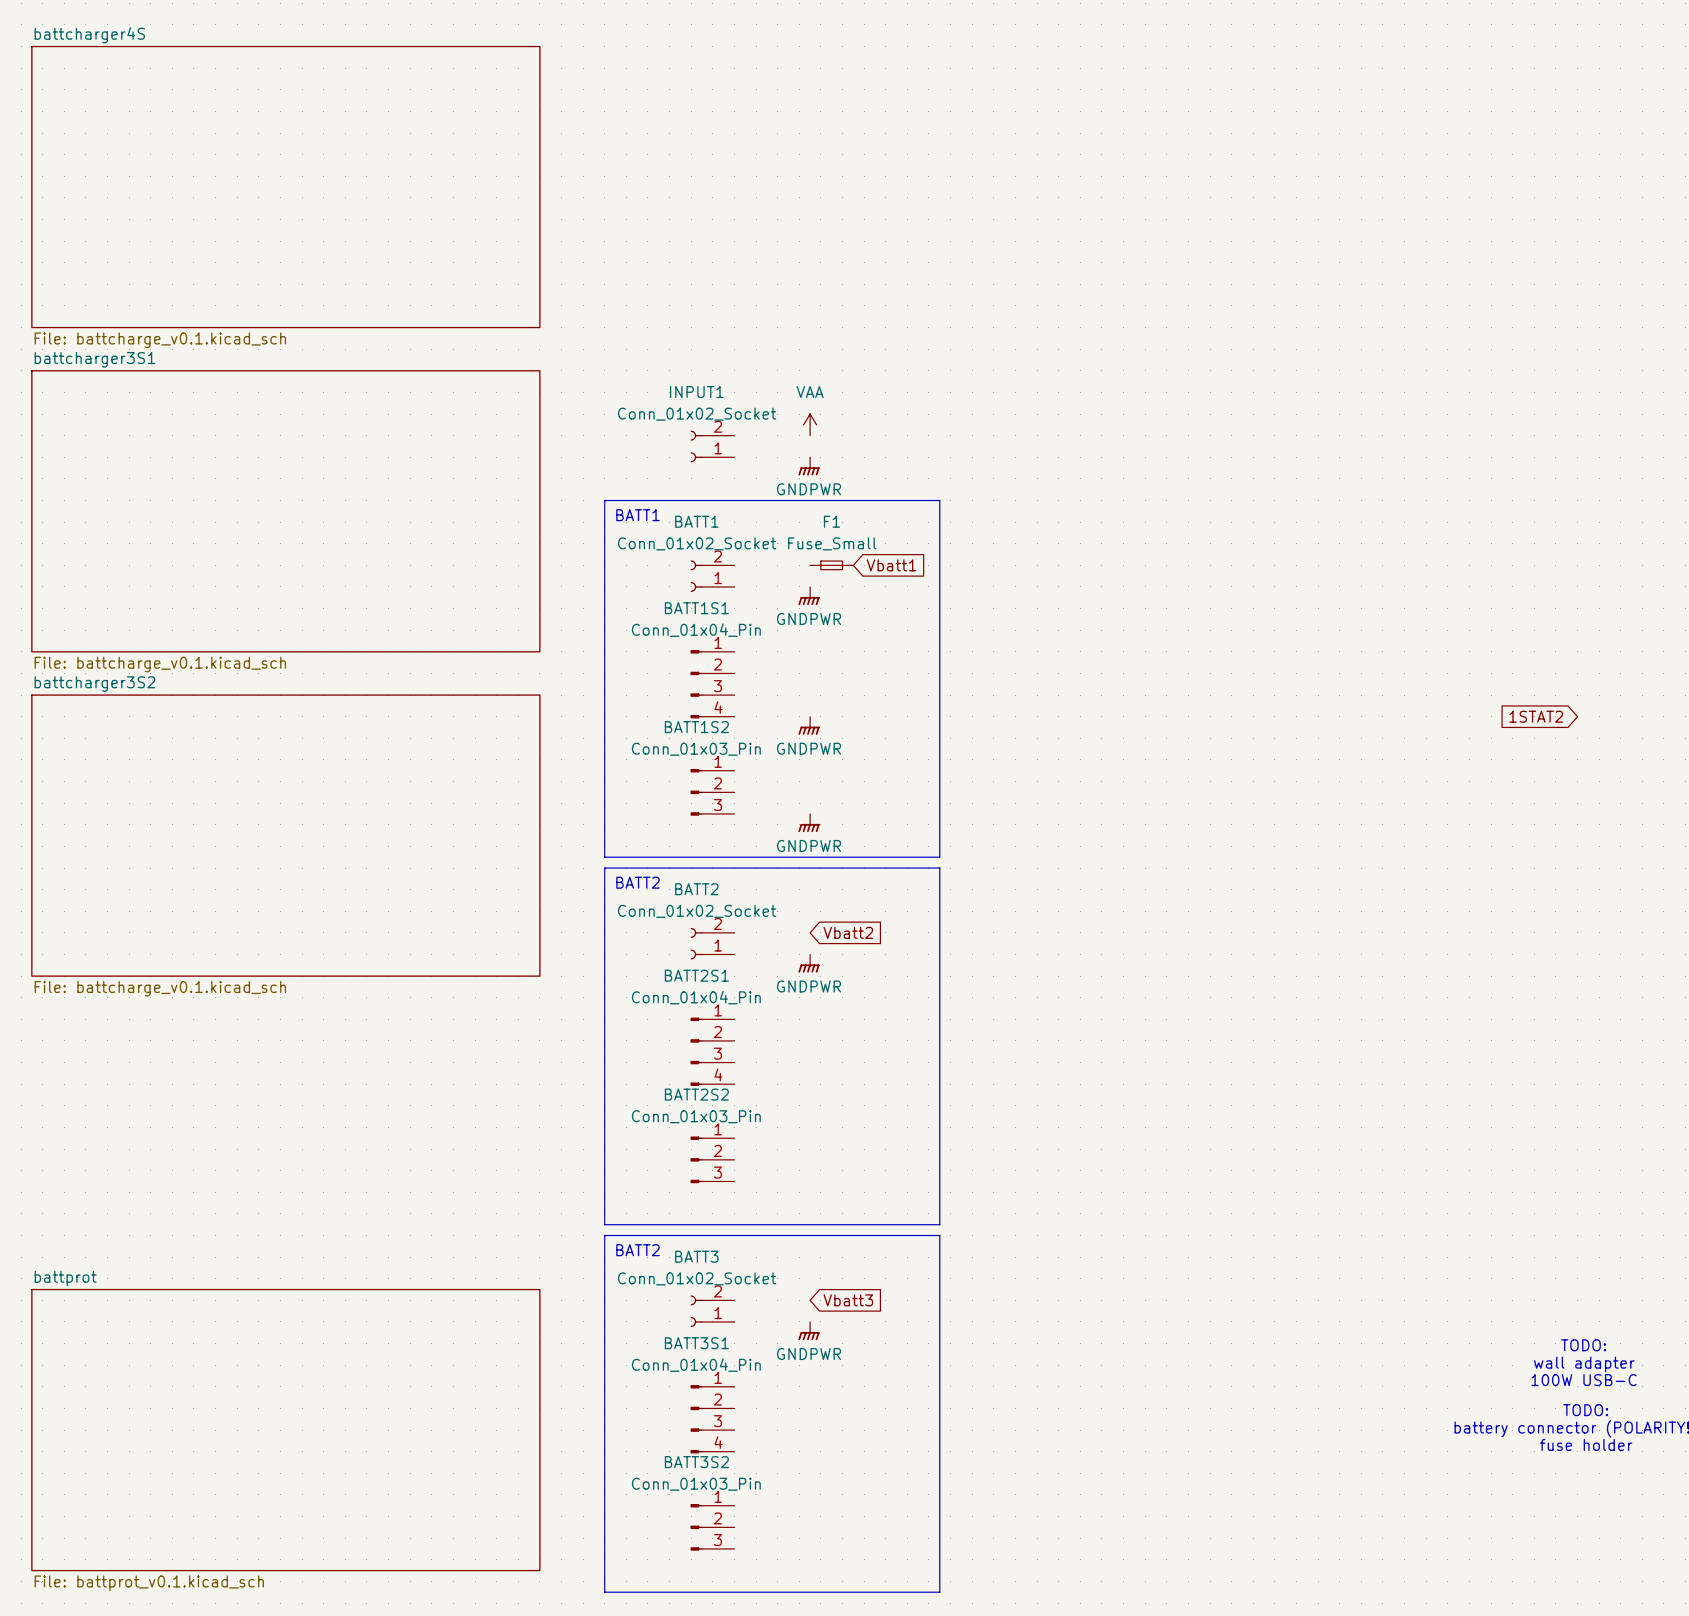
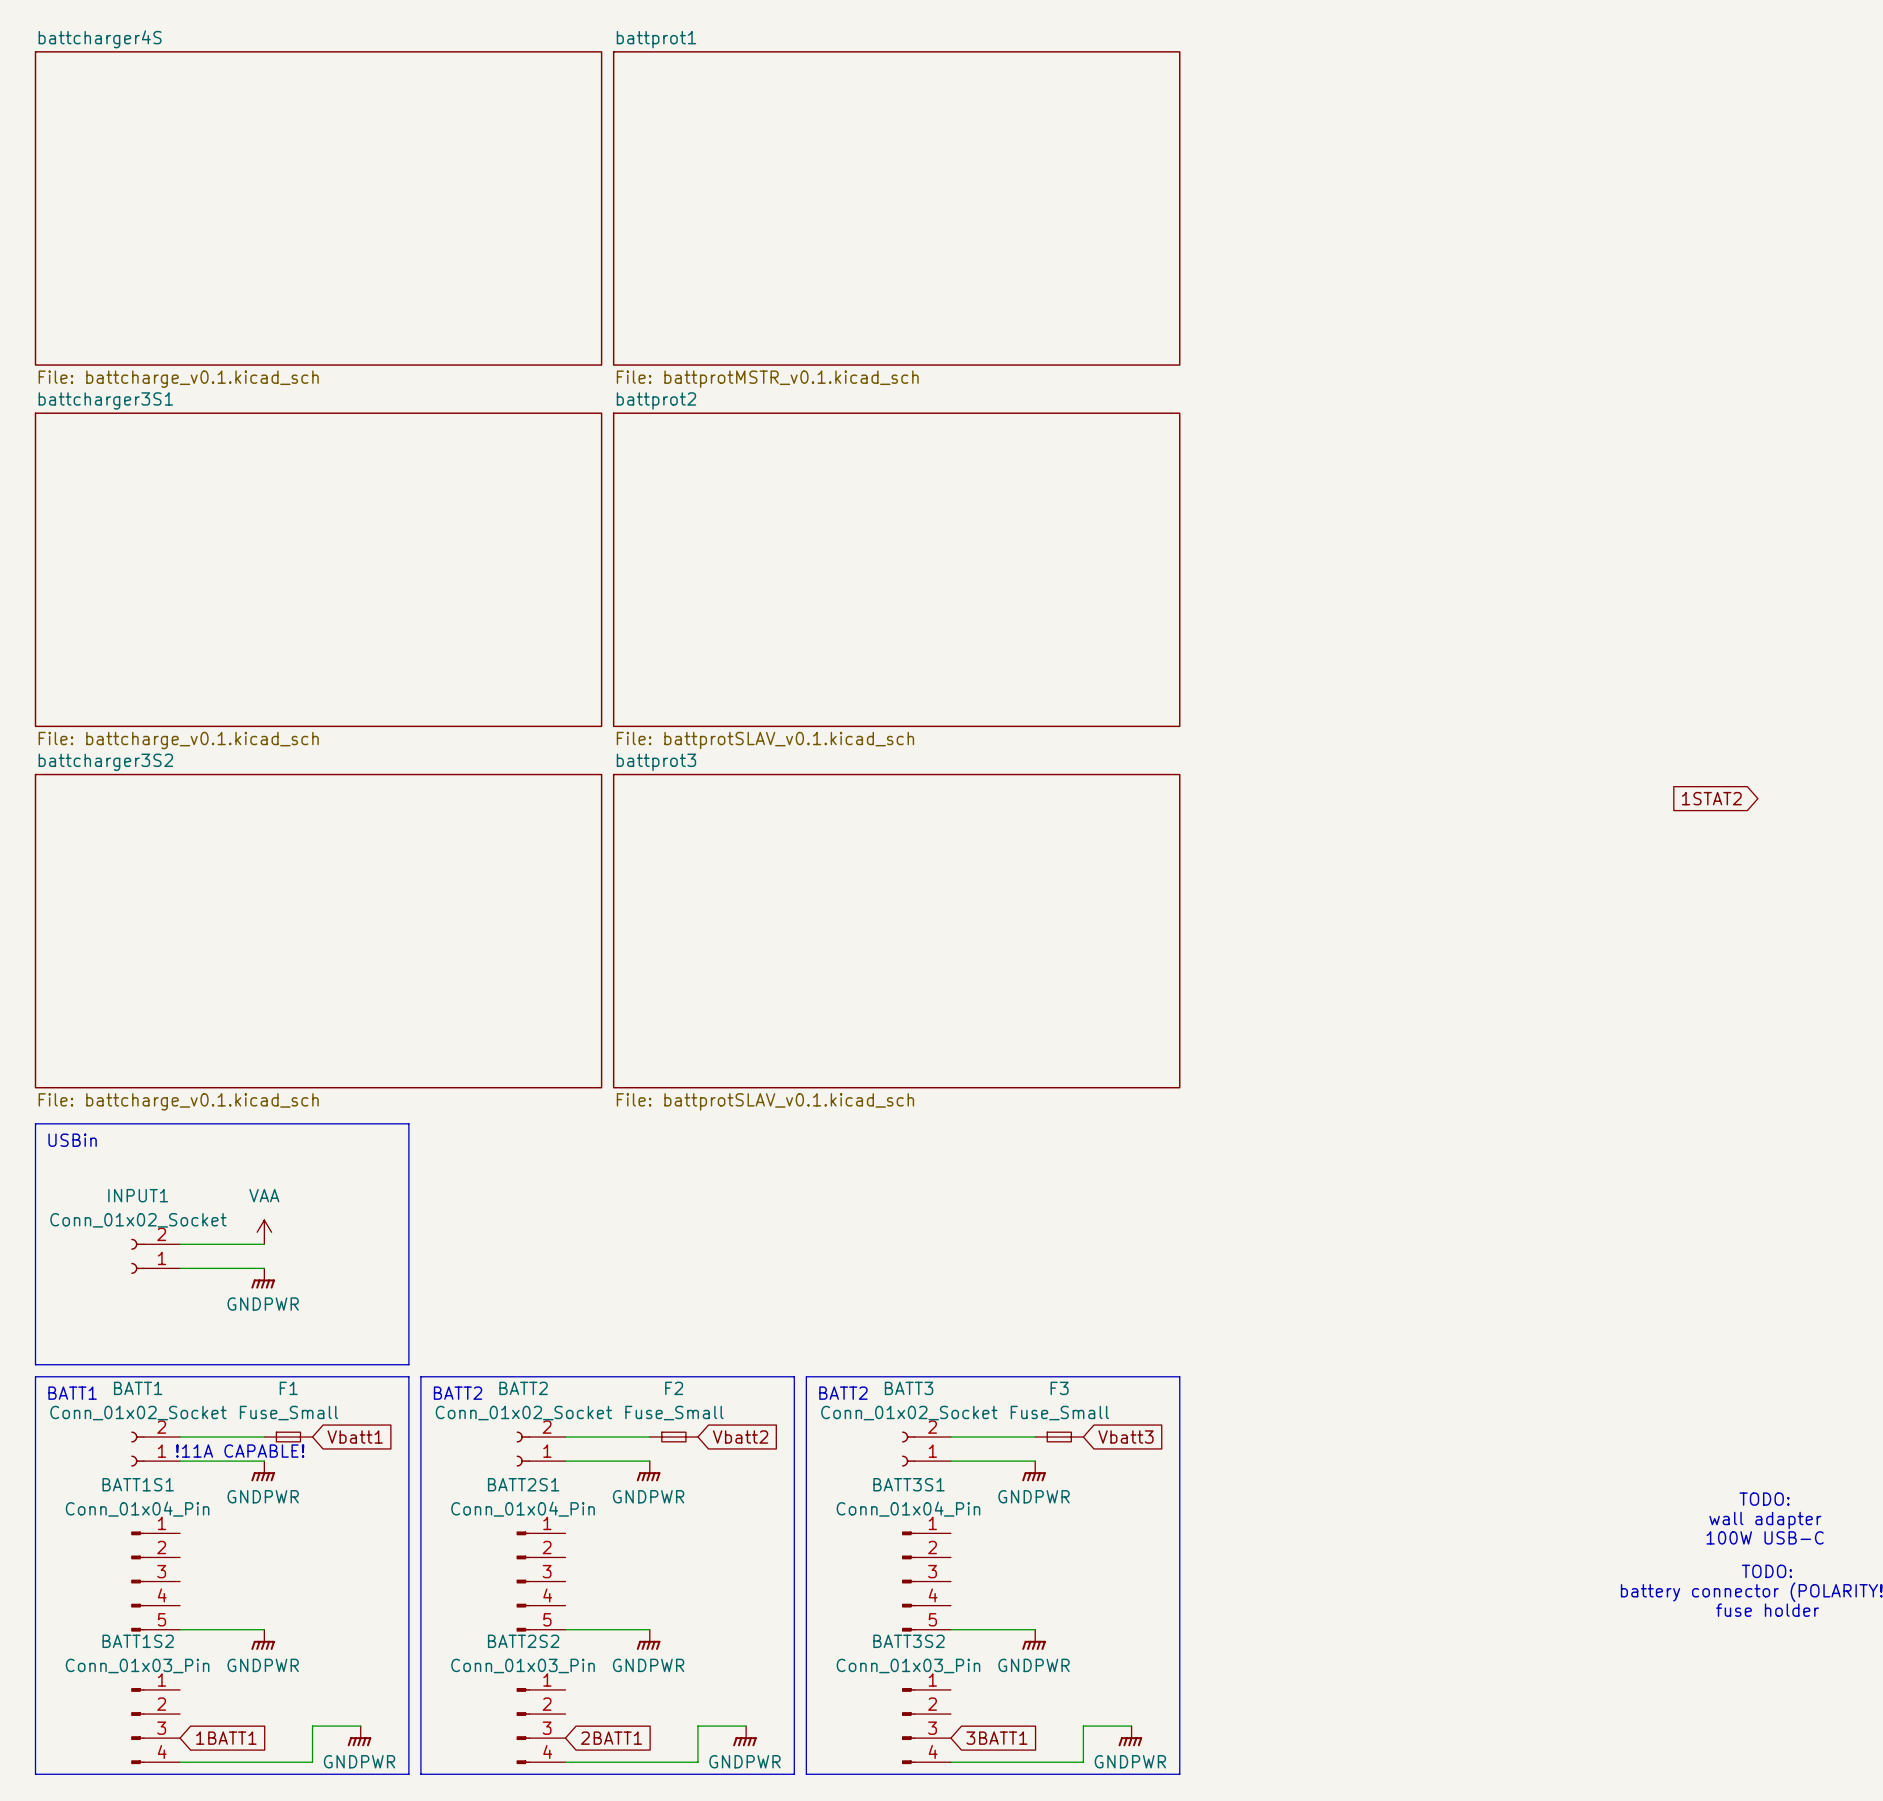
sheet battprot1: none -> File: battprotMSTR_v0.1.kicad_sch (896, 208)
power symbol: VAA (810, 424) -> none
INPUT1 position: (712, 446) -> (155, 1256)
power symbol: GNDPWR (809, 466) -> none
line: (604, 500) (604, 857) (939, 857) (939, 500) (604, 500) -> none
sheet battprot2: none -> File: battprotSLAV_v0.1.kicad_sch (896, 569)
text: BATT1 (638, 515) -> none
F1 position: (831, 565) -> (288, 1437)
global label: Vbatt1 (891, 565) -> none
BATT1 position: (712, 576) -> (155, 1449)
power symbol: GNDPWR (809, 596) -> none
BATT1S1 symbol: [690, 650, 735, 719] -> [131, 1531, 181, 1632]
power symbol: GNDPWR (809, 725) -> none
BATT1S2 symbol: [690, 769, 735, 816] -> [131, 1688, 181, 1765]
power symbol: GNDPWR (809, 823) -> none
sheet battprot3: none -> File: battprotSLAV_v0.1.kicad_sch (896, 931)
line: (604, 868) (604, 1224) (939, 1224) (939, 868) (604, 868) -> none
text: BATT2 (638, 882) -> none
global label: Vbatt2 (848, 932) -> none
BATT2 position: (712, 943) -> (541, 1449)
power symbol: GNDPWR (809, 963) -> none
line: none -> (35, 1123) (408, 1123) (408, 1364) (35, 1364) (35, 1123)
BATT2S1 symbol: [690, 1017, 735, 1086] -> [516, 1531, 566, 1632]
text: none -> USBin (72, 1140)
power symbol: none -> VAA (264, 1232)
wire: none -> (180, 1244) (264, 1244)
BATT2S2 symbol: [690, 1136, 735, 1184] -> [516, 1688, 566, 1765]
wire: none -> (180, 1268) (264, 1268)
power symbol: none -> GNDPWR (263, 1278)
line: none -> (35, 1376) (408, 1376) (408, 1774) (35, 1774) (35, 1376)
line: (604, 1235) (604, 1592) -> (673, 1376) (420, 1376) (420, 1774) (673, 1774)
line: (712, 1235) (723, 1235) -> (794, 1376) (794, 1774)
line: (939, 1235) (939, 1592) -> (1047, 1376) (1179, 1376) (1179, 1774) (1047, 1774)
text: none -> BATT1 (72, 1393)
text: none -> BATT2 (458, 1393)
text: BATT2 (638, 1250) -> none
text: none -> BATT2 (843, 1393)
global label: none -> Vbatt1 (355, 1437)
wire: none -> (565, 1437) (649, 1437)
F2: none -> Fuse_Small (673, 1437)
global label: none -> Vbatt2 (740, 1437)
wire: none -> (950, 1437) (1035, 1437)
F3: none -> Fuse_Small (1059, 1437)
global label position: Vbatt3 (848, 1300) -> Vbatt3 (1125, 1437)
text: none -> !11A CAPABLE! (240, 1451)
wire: none -> (180, 1461) (264, 1461)
wire: none -> (565, 1461) (649, 1461)
BATT3 position: (712, 1311) -> (926, 1449)
wire: none -> (950, 1461) (1035, 1461)
power symbol: none -> GNDPWR (263, 1471)
power symbol: none -> GNDPWR (648, 1471)
power symbol: none -> GNDPWR (1034, 1471)
power symbol: GNDPWR (809, 1331) -> none
BATT3S1 symbol: [690, 1385, 735, 1454] -> [902, 1531, 951, 1632]
sheet battprot: File: battprot_v0.1.kicad_sch (285, 1430) -> none
wire: none -> (180, 1629) (264, 1629)
wire: none -> (565, 1629) (649, 1629)
wire: none -> (950, 1629) (1035, 1629)
power symbol: none -> GNDPWR (263, 1639)
power symbol: none -> GNDPWR (648, 1639)
power symbol: none -> GNDPWR (1034, 1639)
BATT3S2 symbol: [690, 1504, 735, 1551] -> [902, 1688, 951, 1765]
wire: none -> (360, 1726) (312, 1726) (312, 1762) (180, 1762)
wire: none -> (746, 1726) (697, 1726) (697, 1762) (565, 1762)
wire: none -> (1131, 1726) (1083, 1726) (1083, 1762) (950, 1762)
power symbol: none -> GNDPWR (359, 1736)
power symbol: none -> GNDPWR (744, 1736)
power symbol: none -> GNDPWR (1130, 1736)
global label: none -> 1BATT1 (226, 1738)
global label: none -> 2BATT1 (611, 1738)
global label: none -> 3BATT1 (996, 1738)
line: (712, 1592) (723, 1592) -> (806, 1376) (806, 1774)

